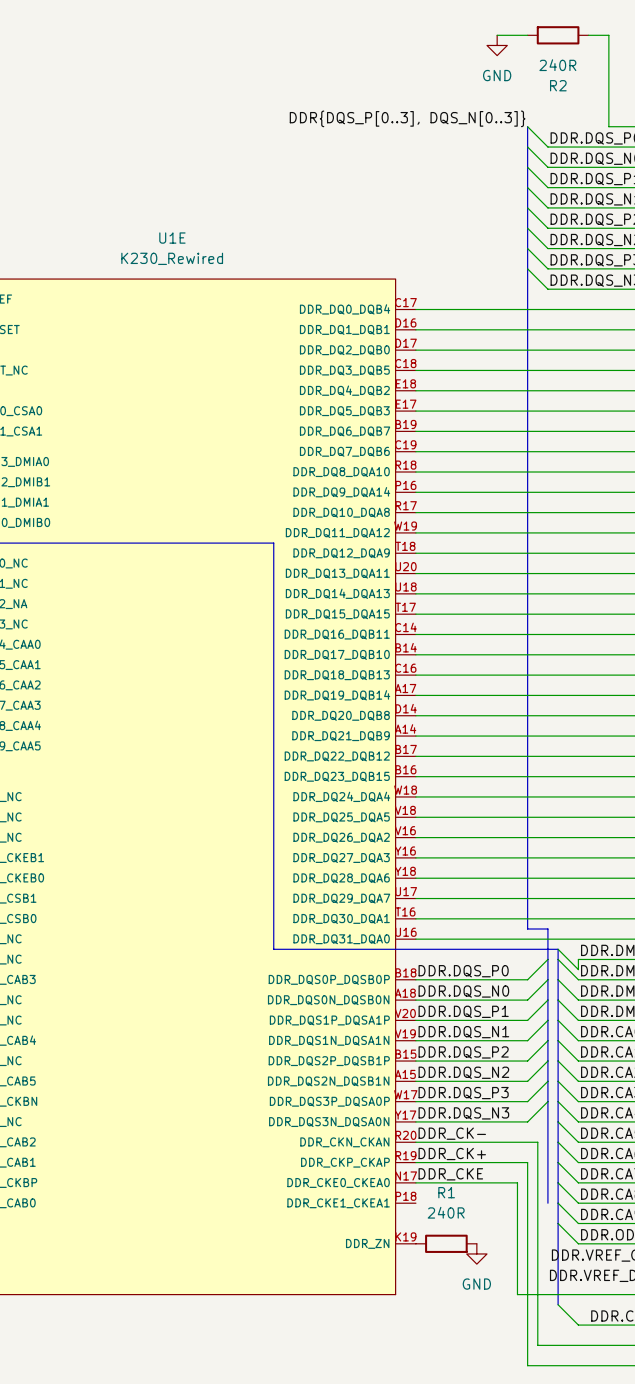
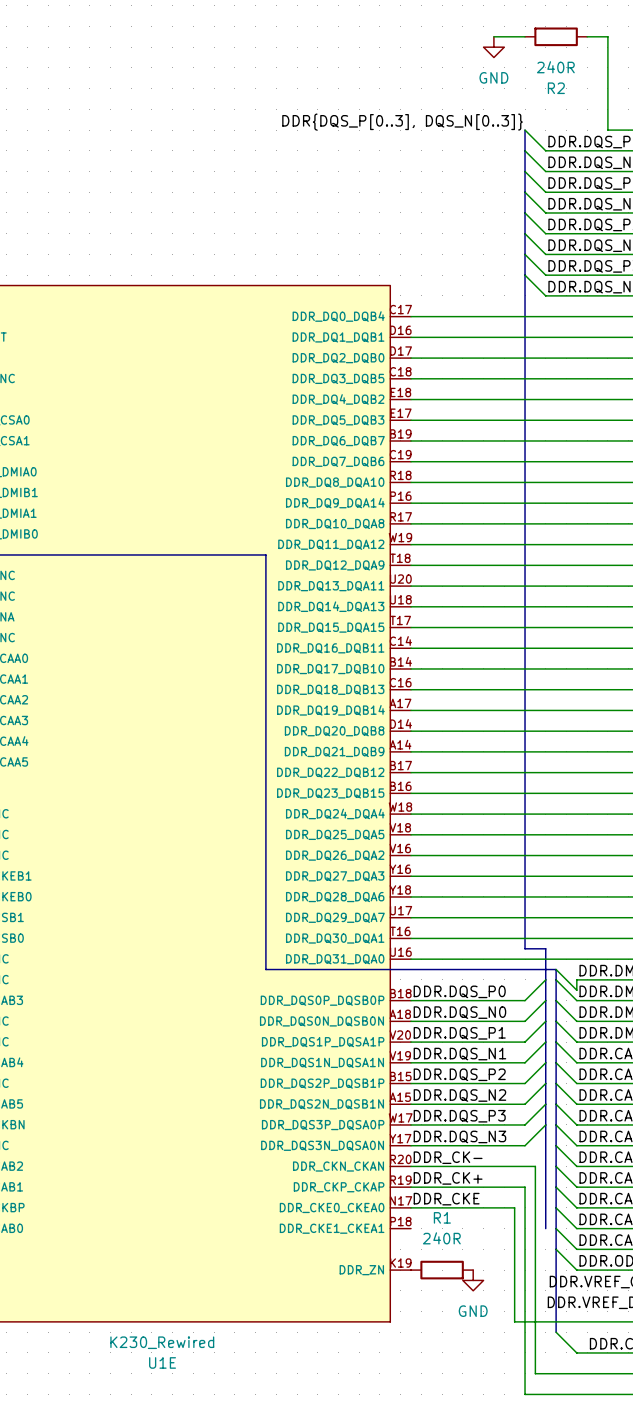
U1E name position: U1E (172, 238) -> U1E (162, 1362)
U1E value position: K230_Rewired (172, 258) -> K230_Rewired (162, 1342)

